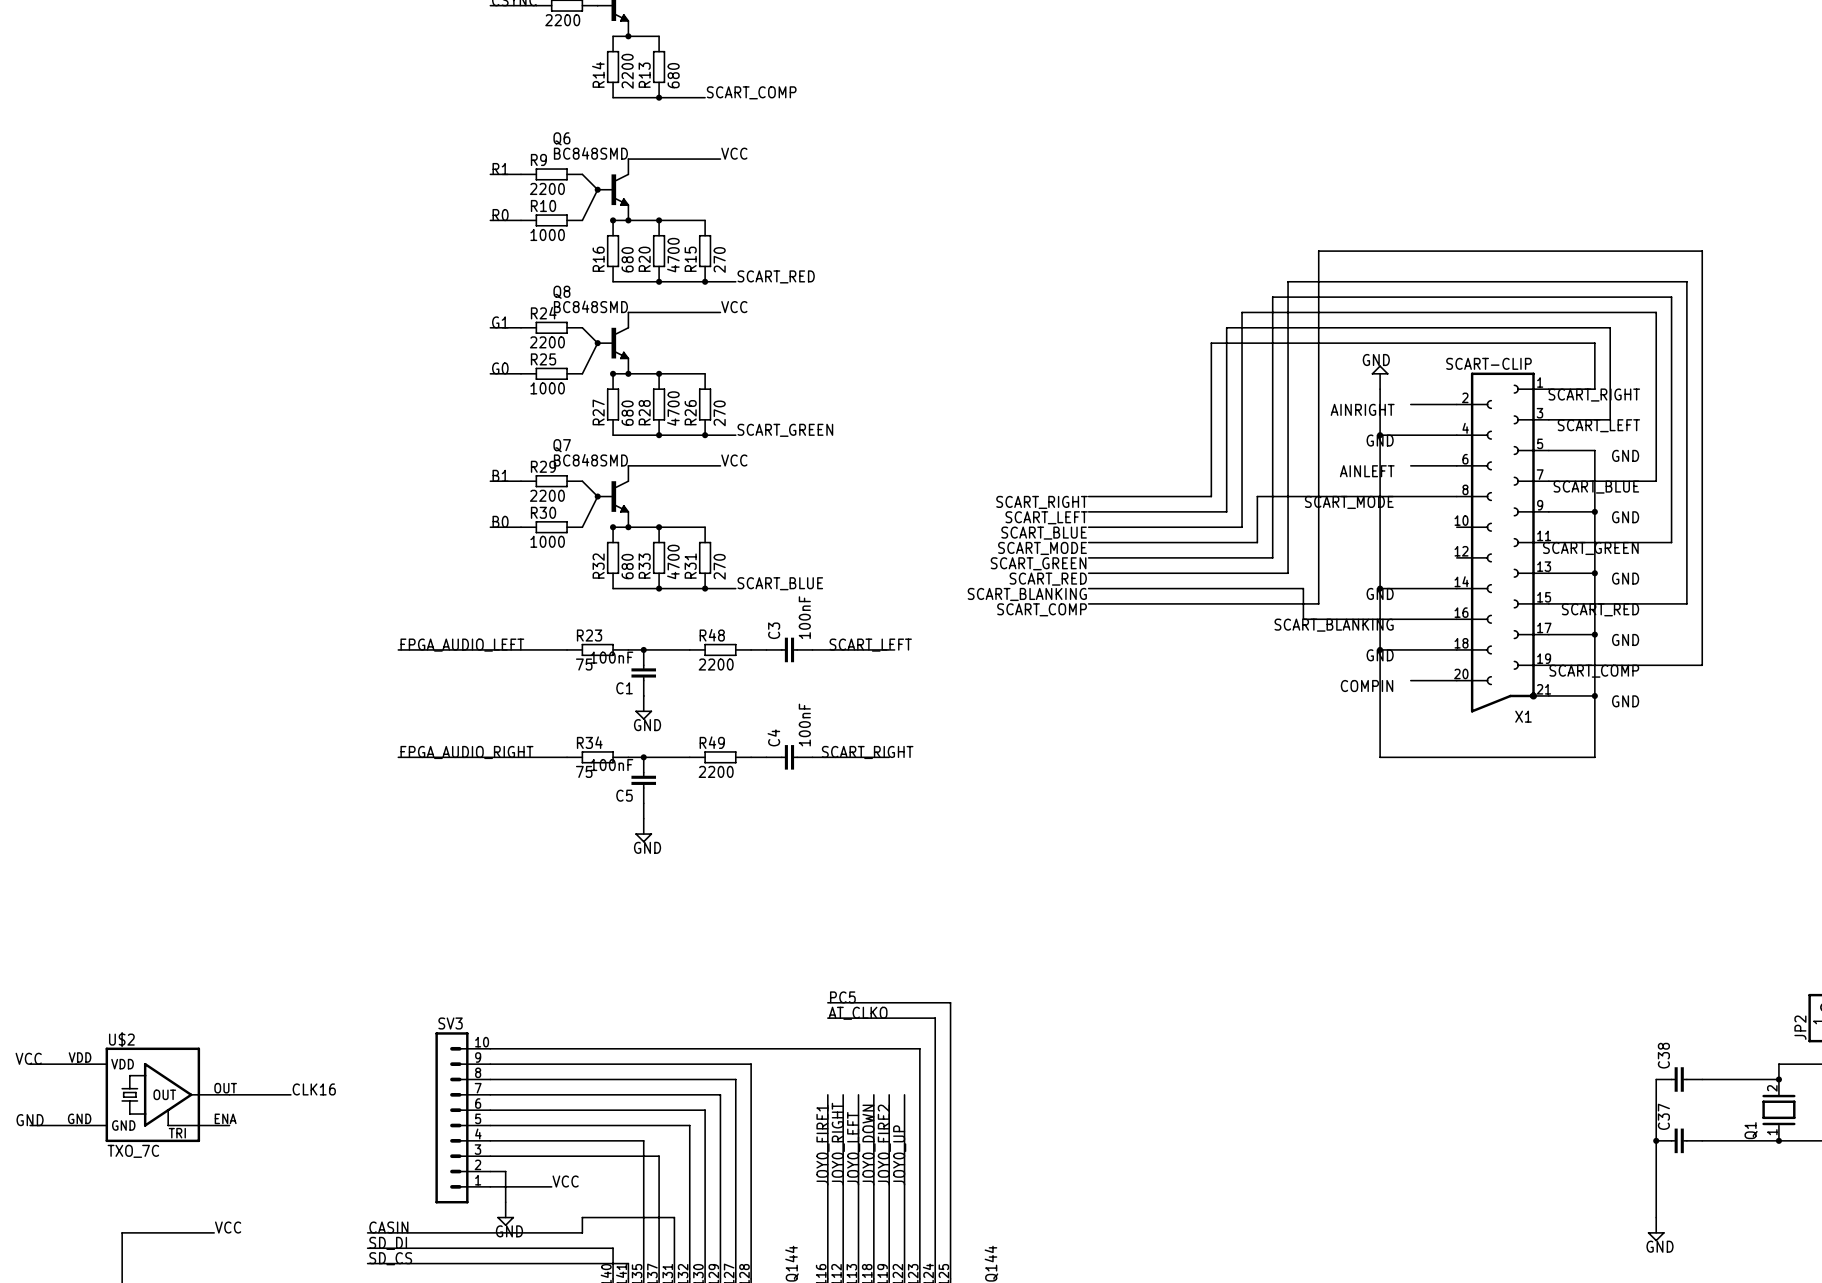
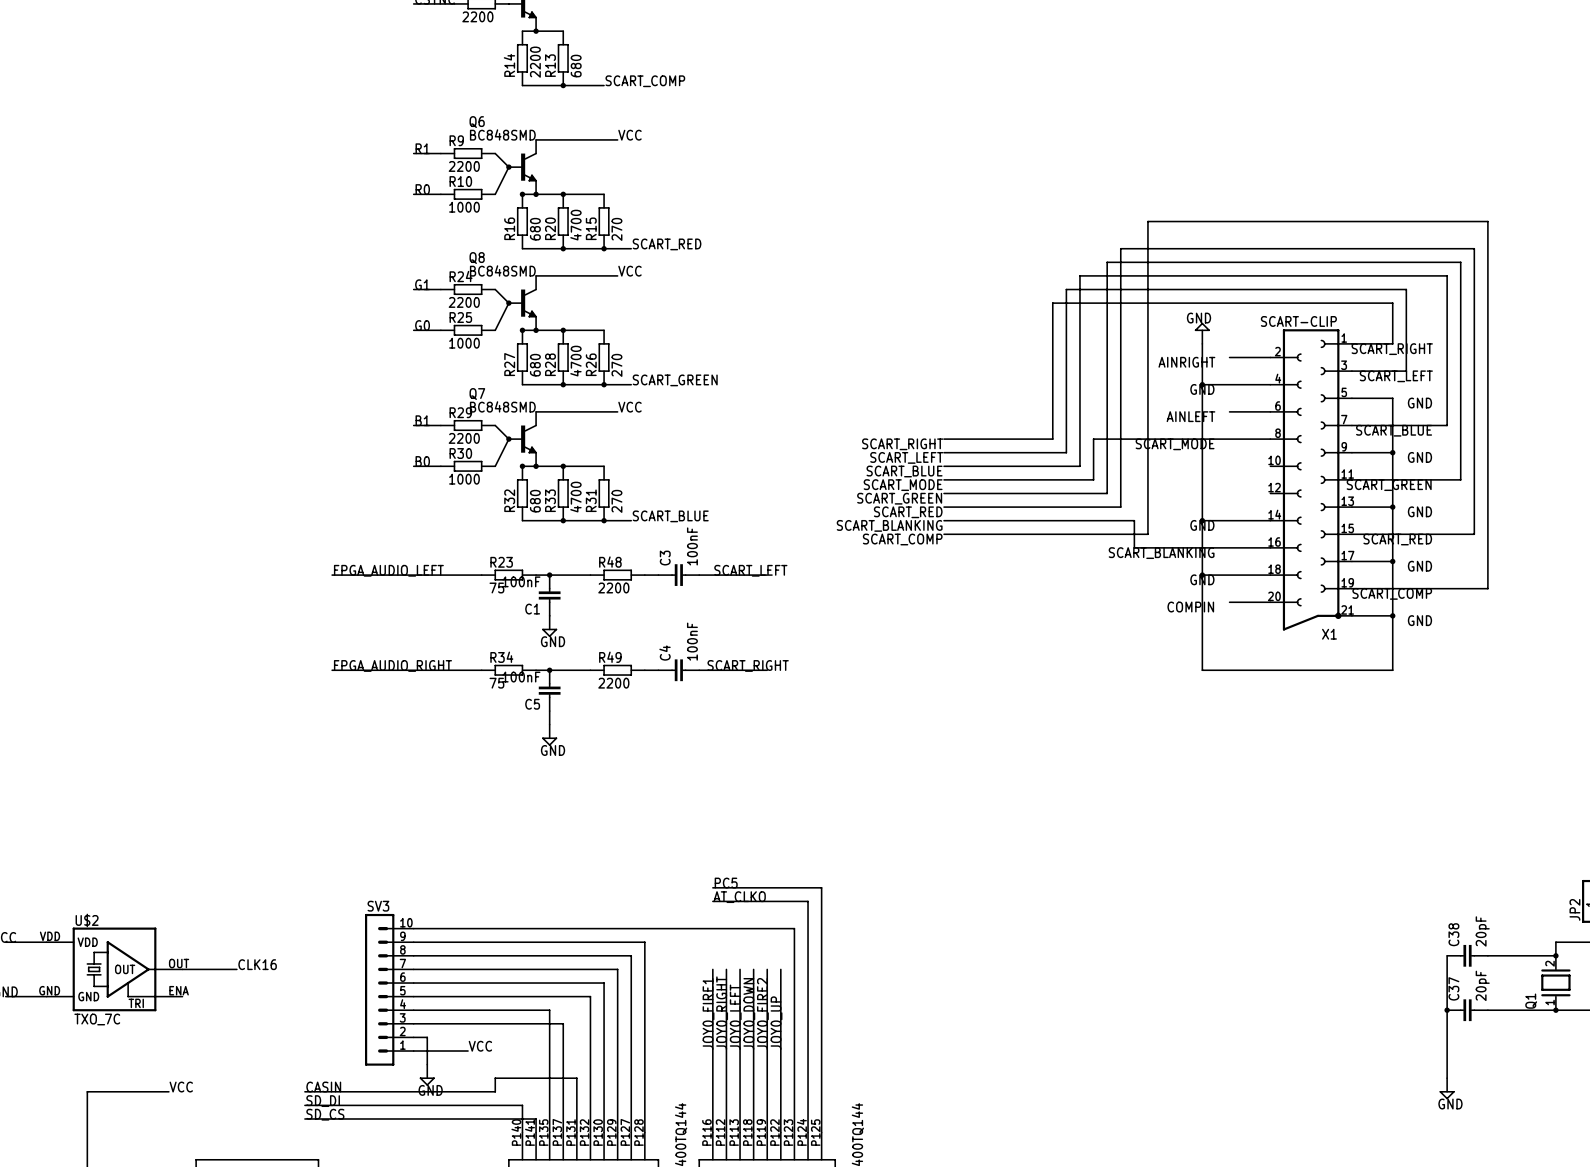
C38 value: none -> 20pF (1482, 931)
C37 value: none -> 20pF (1482, 985)

